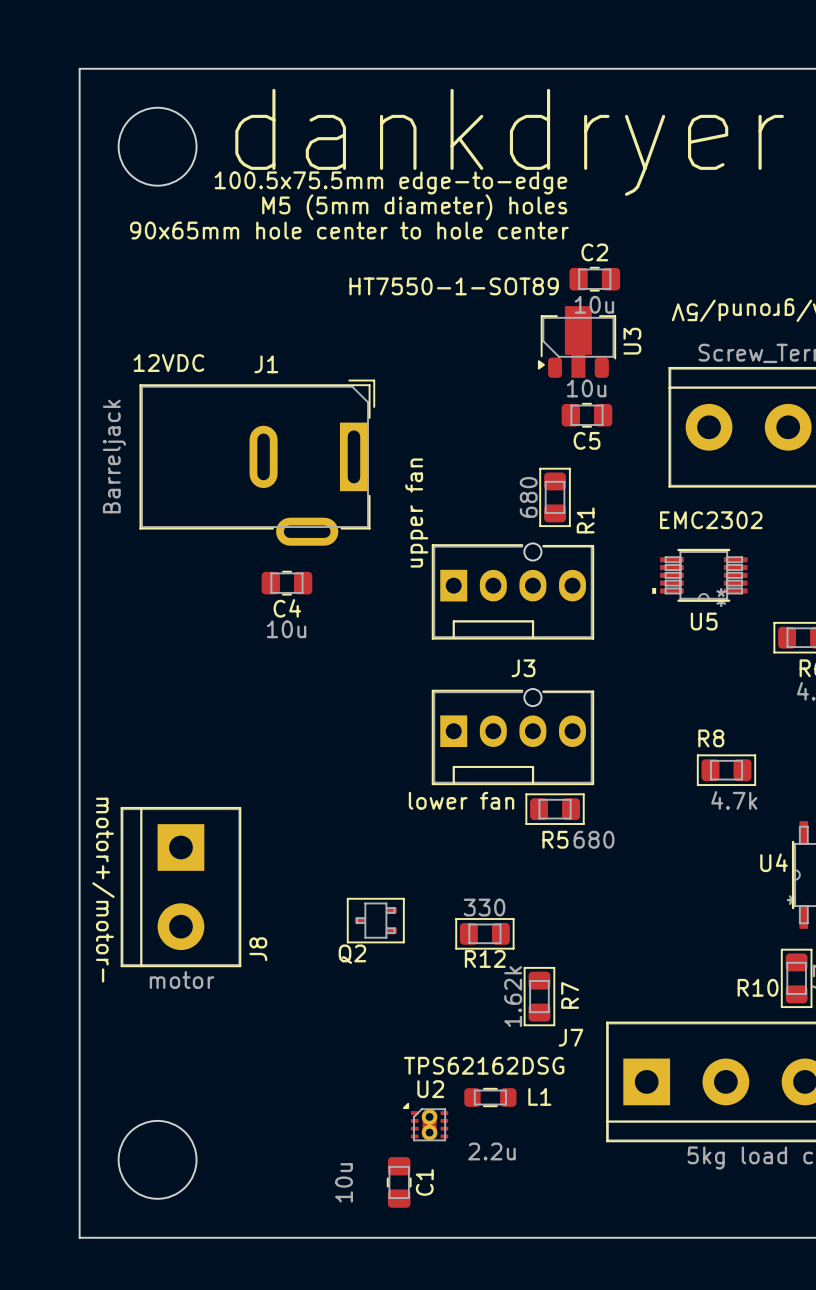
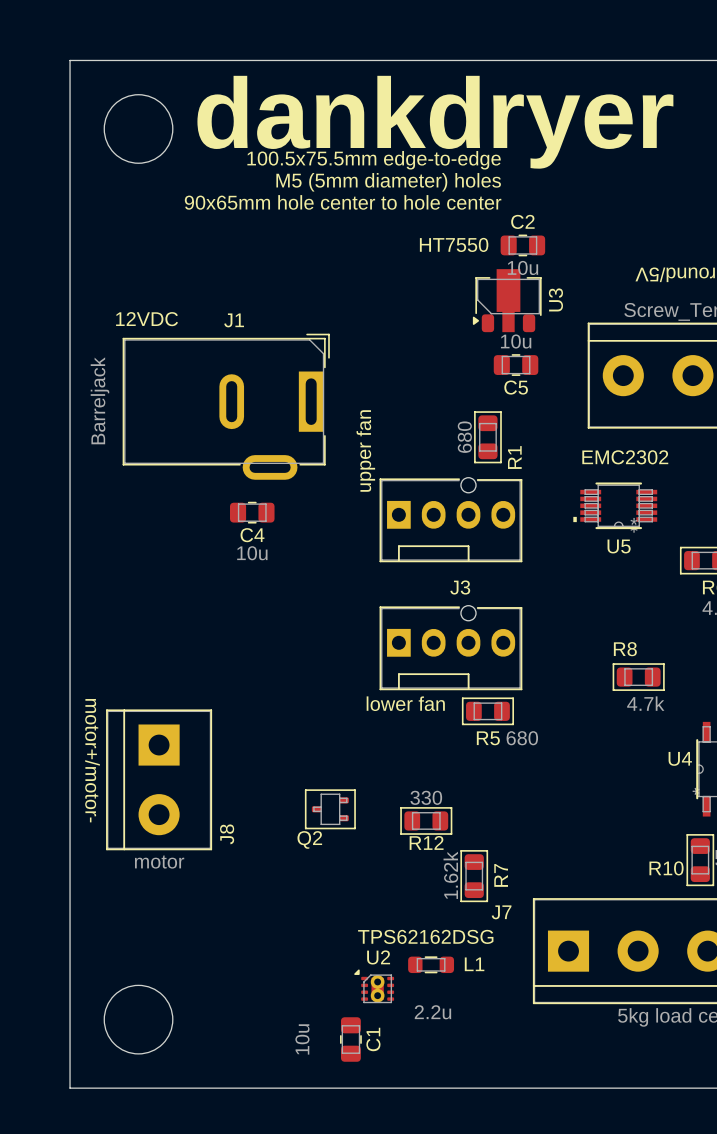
U3 value: HT7550-1-SOT89 (454, 286) -> HT7550 (454, 244)

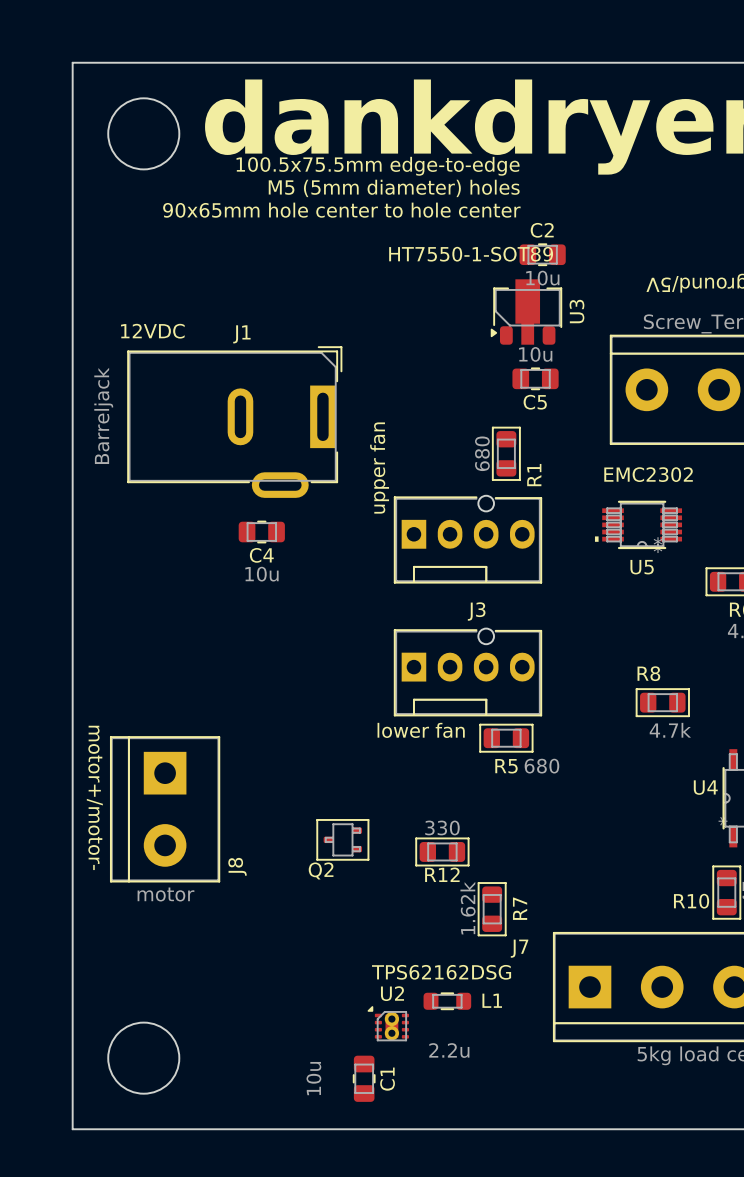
U3 value: HT7550 (454, 244) -> HT7550-1-SOT89 (471, 254)

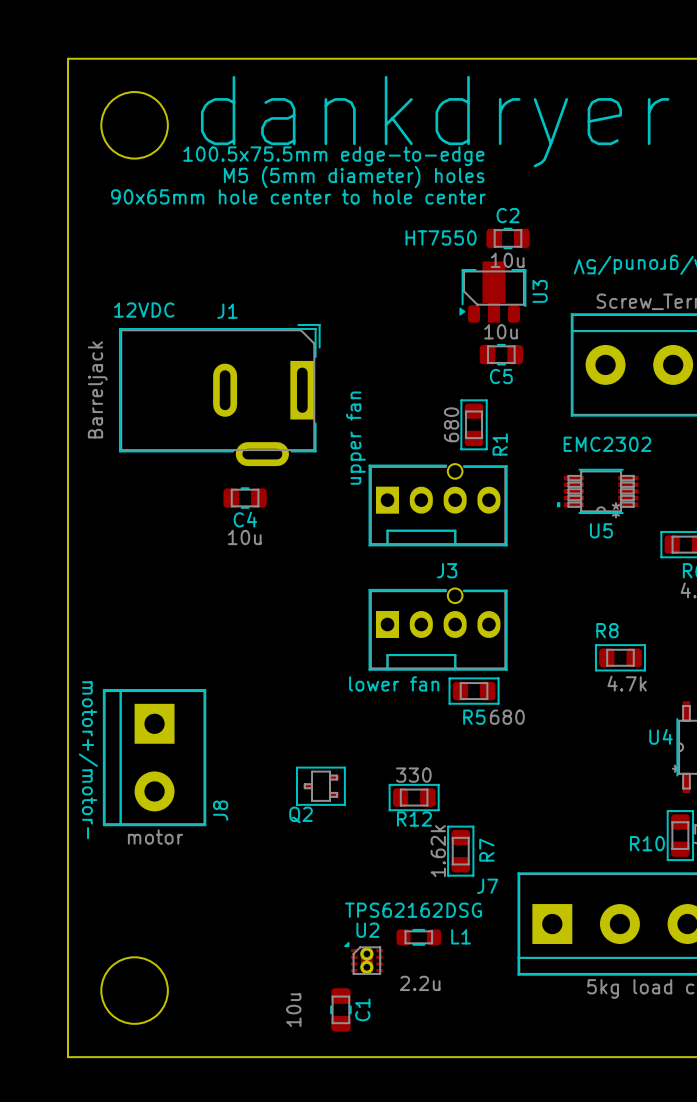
U3 value: HT7550-1-SOT89 (471, 254) -> HT7550 (441, 237)

